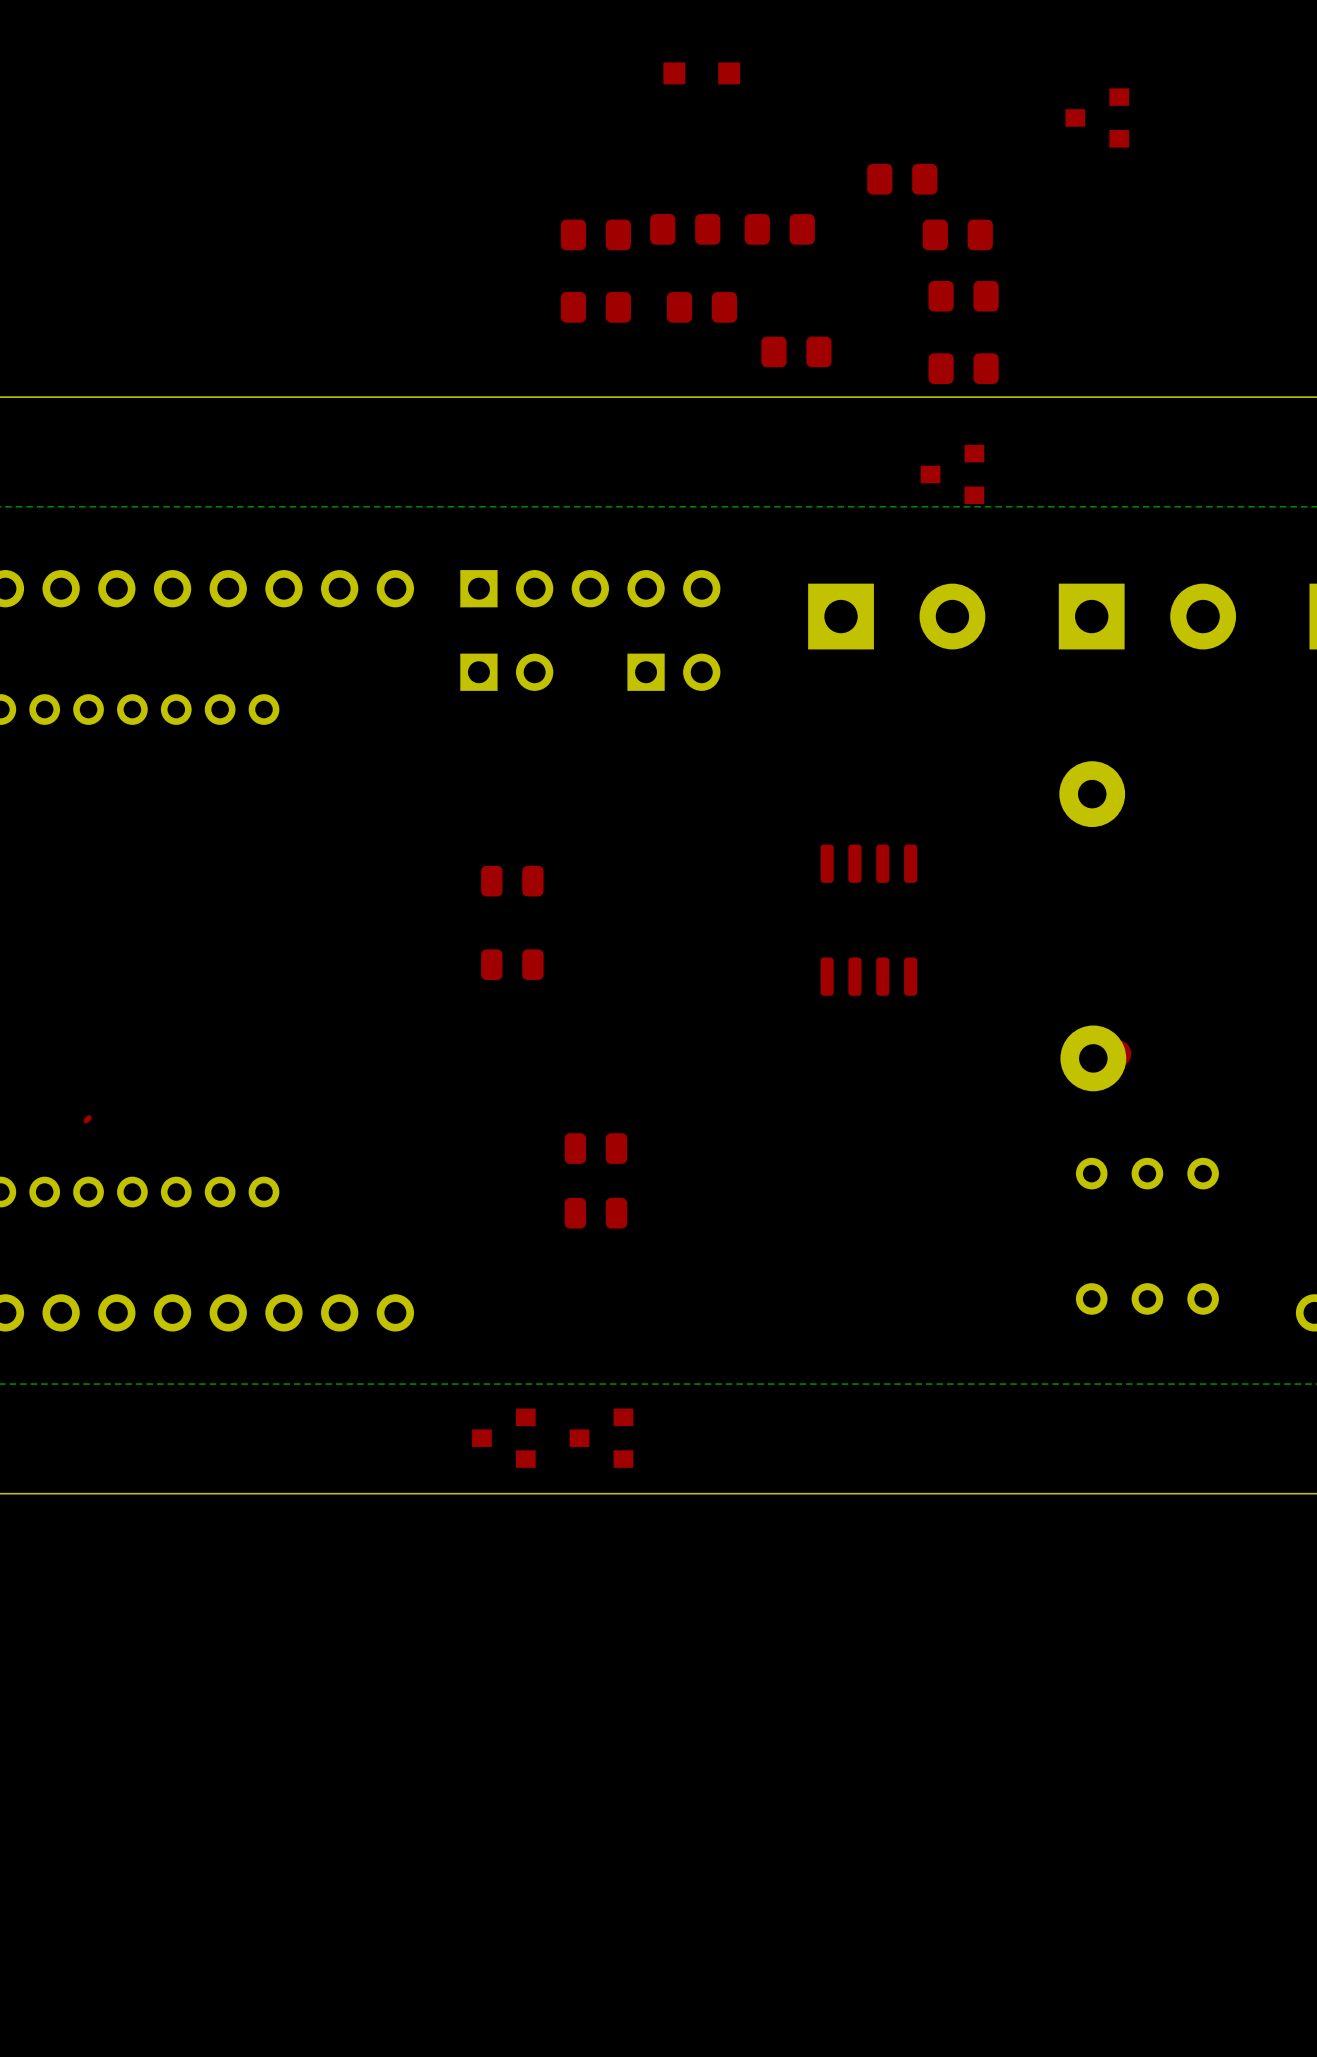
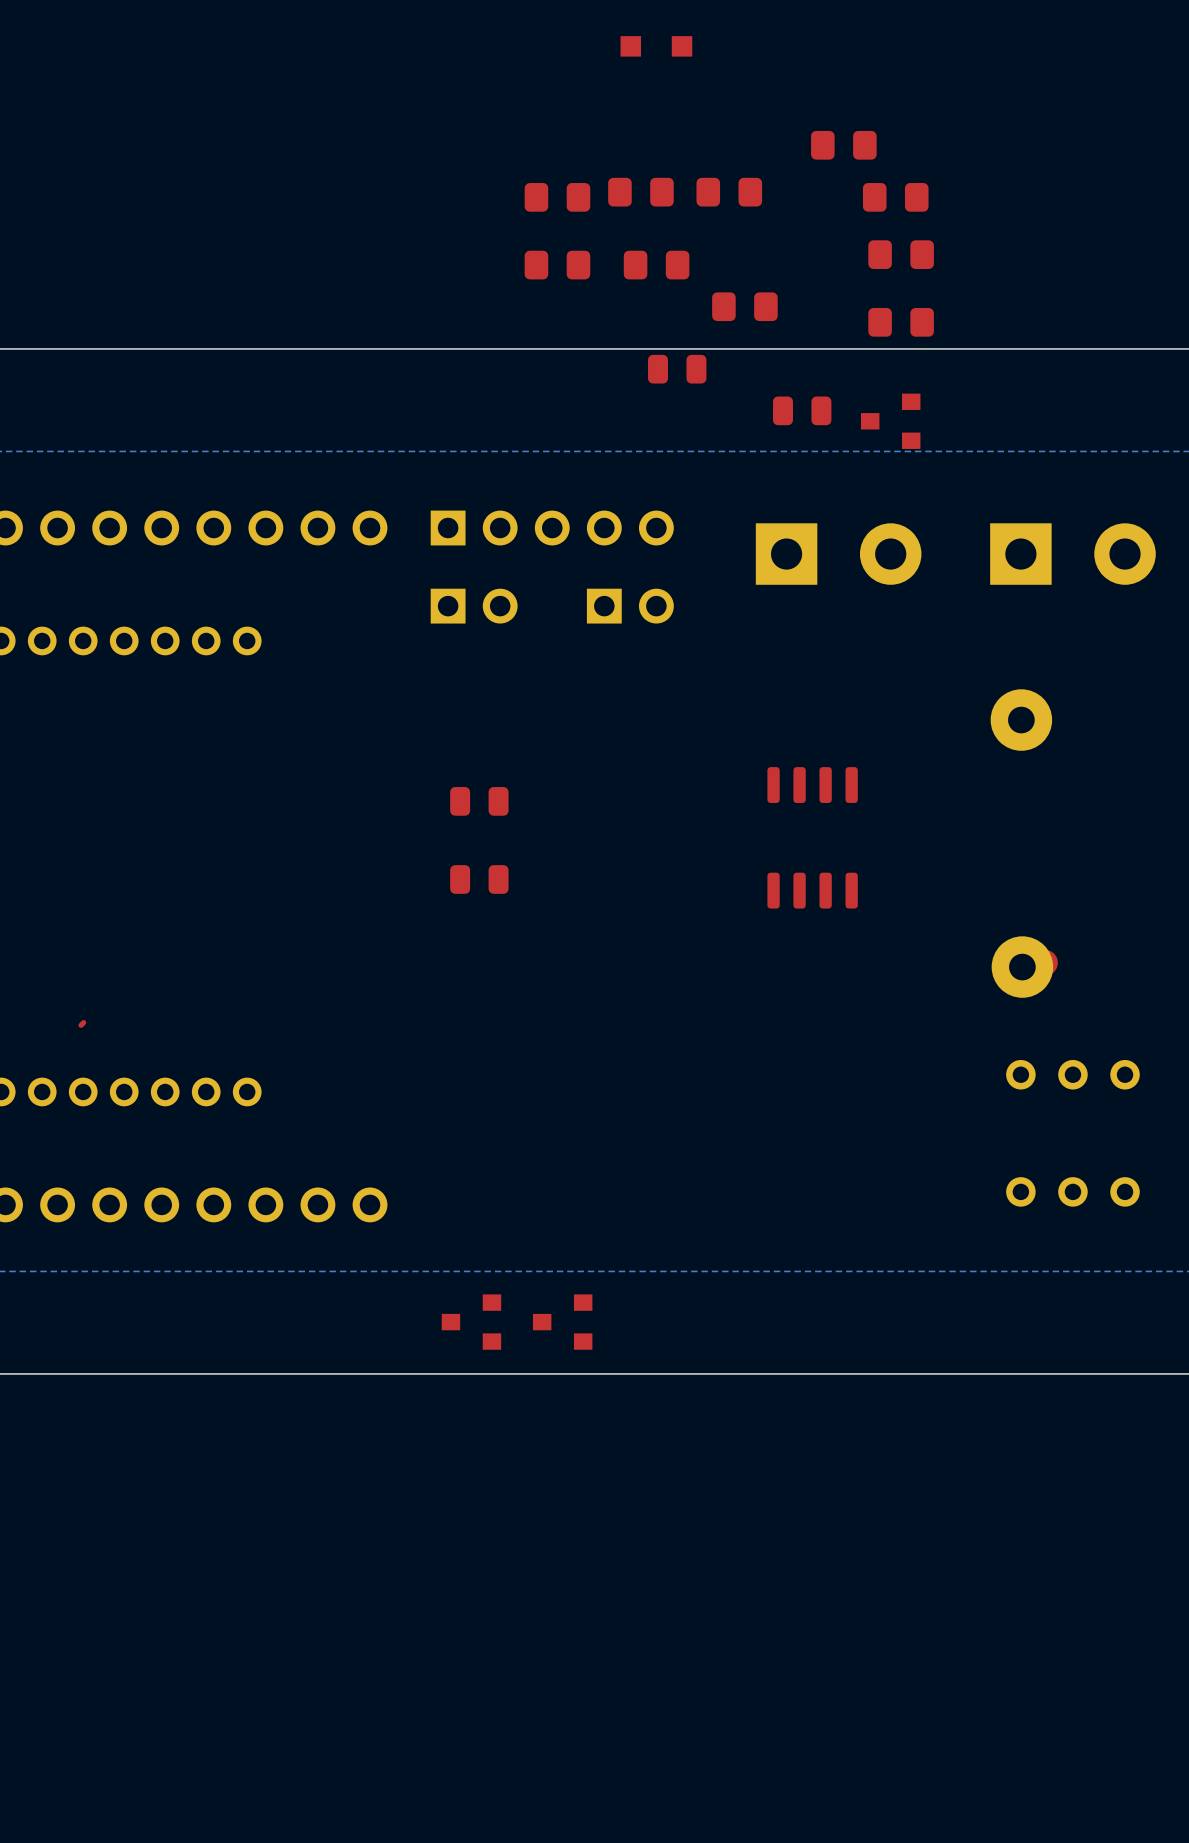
part: (1097, 117) -> none
part: none -> (677, 369)
part: none -> (802, 410)
part: (595, 1148) -> none
part: (595, 1213) -> none

